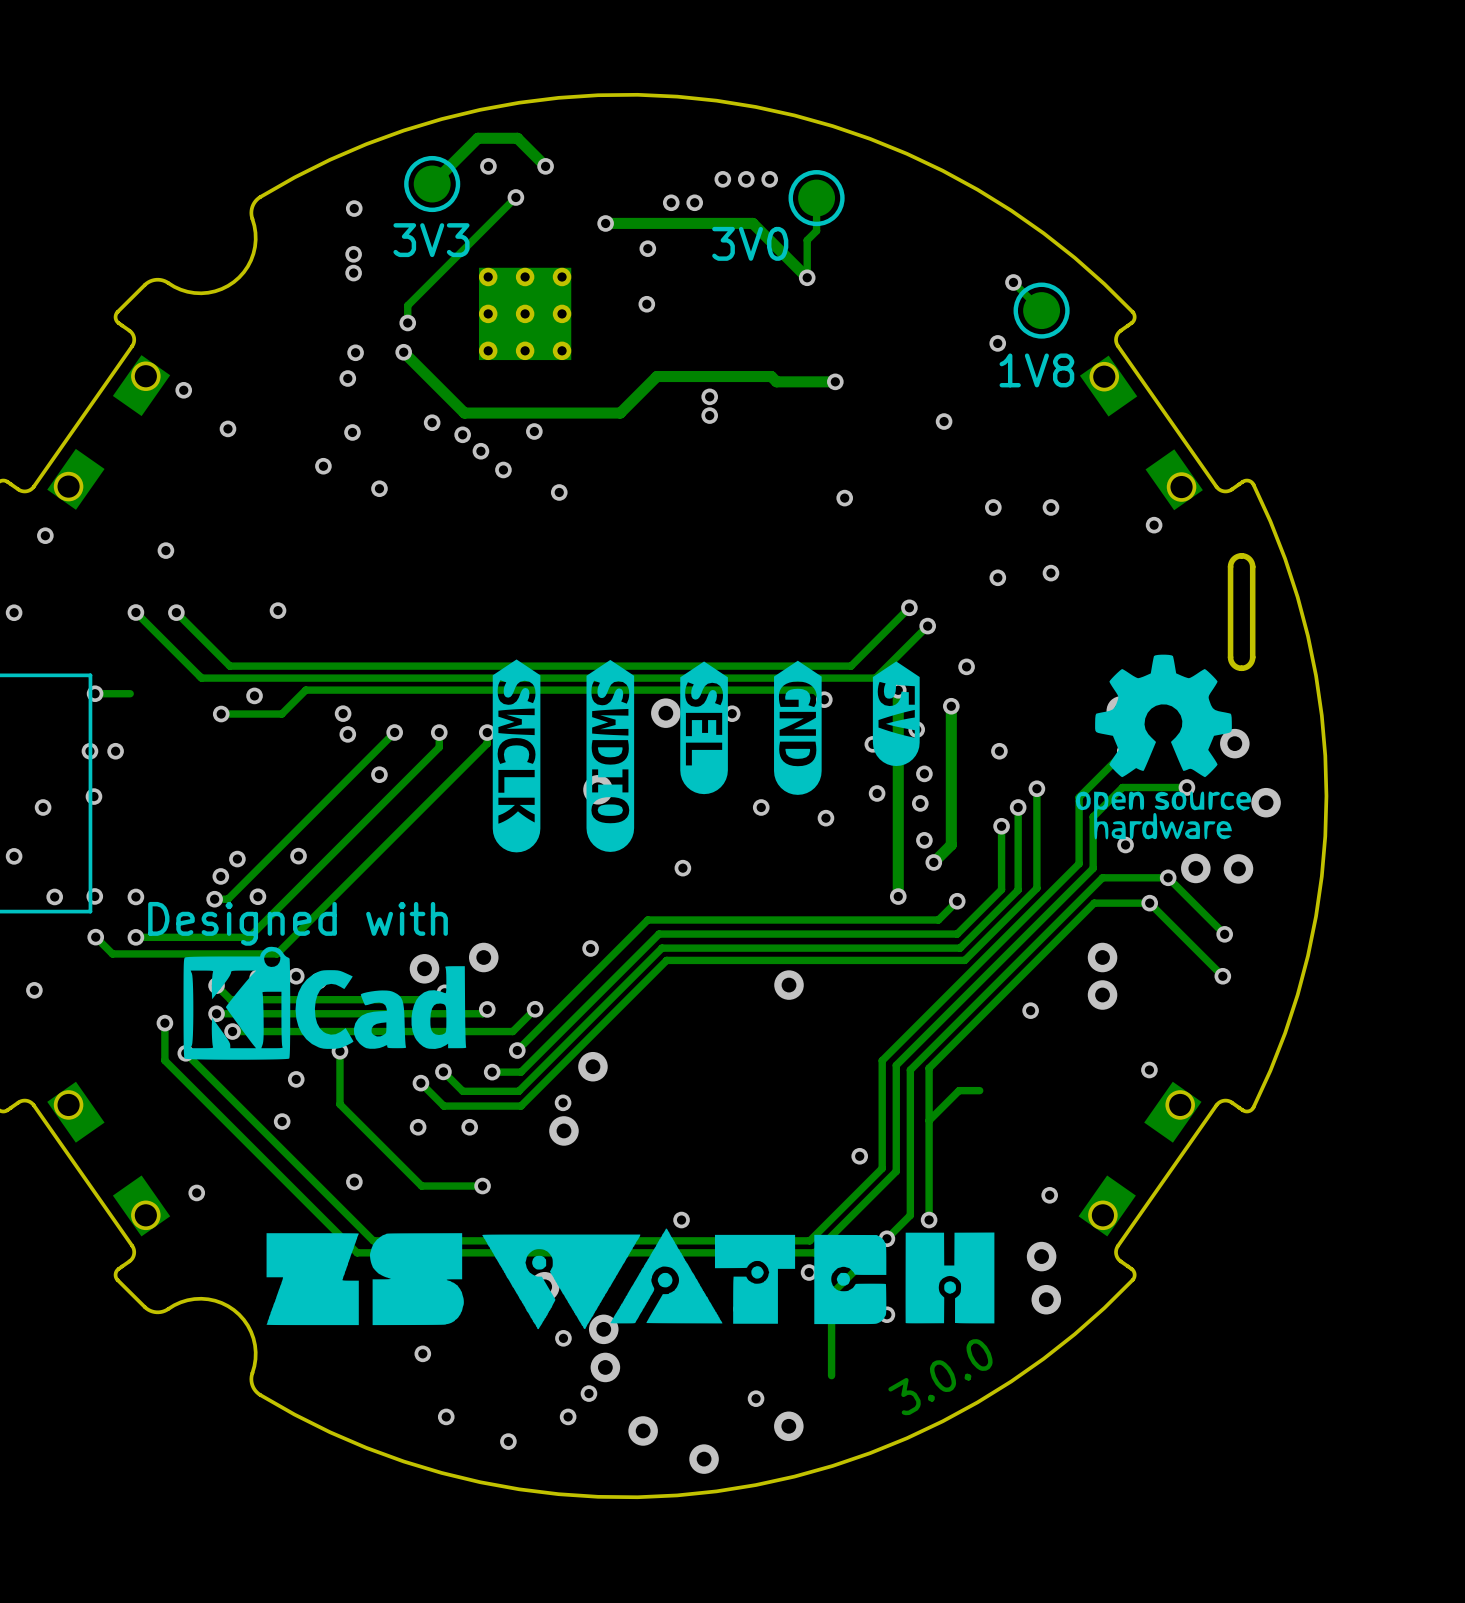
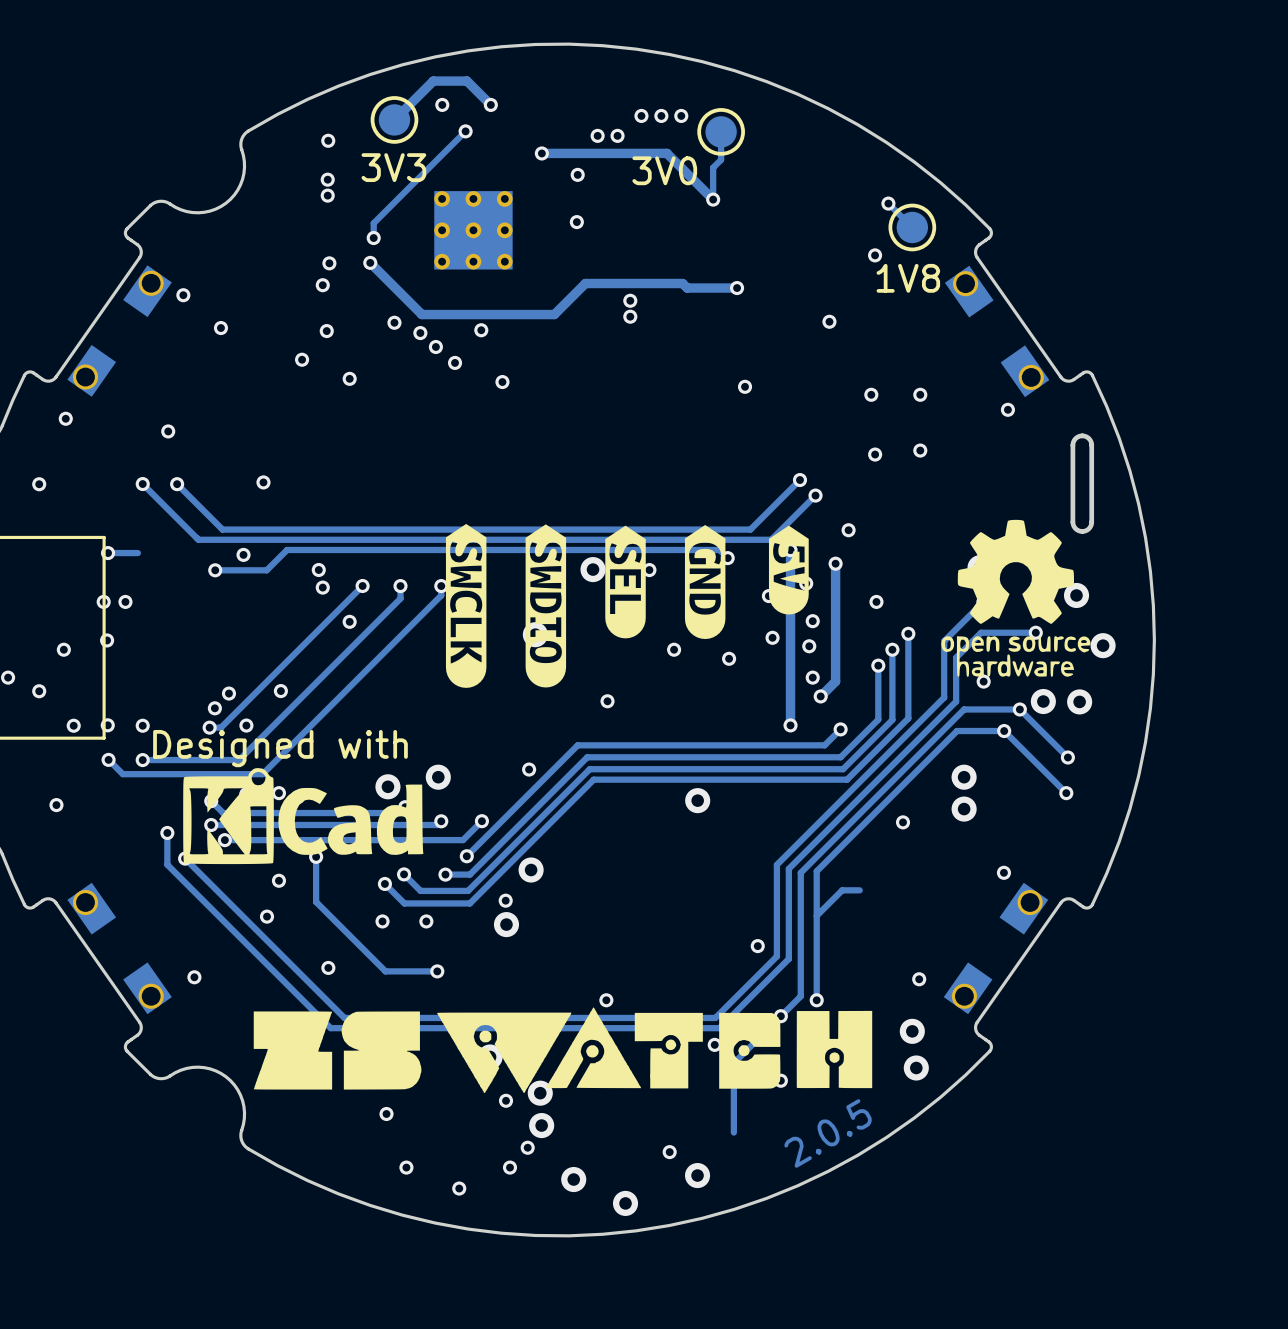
text: 3.0.0 (940, 1377) -> 2.0.5 (828, 1133)

